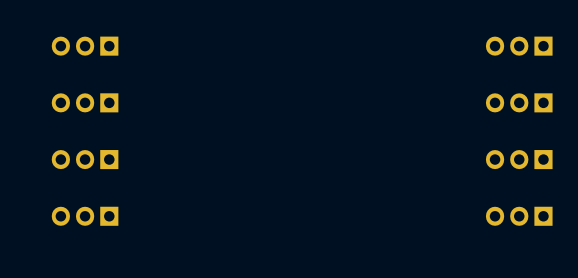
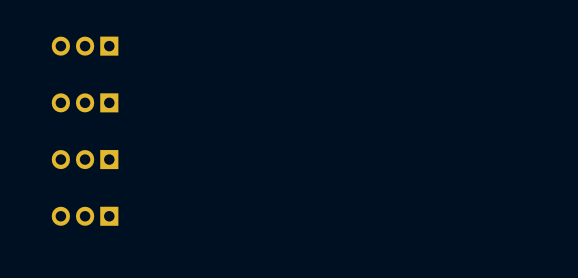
part: (519, 46) -> none
part: (519, 102) -> none
part: (519, 159) -> none
part: (519, 216) -> none

